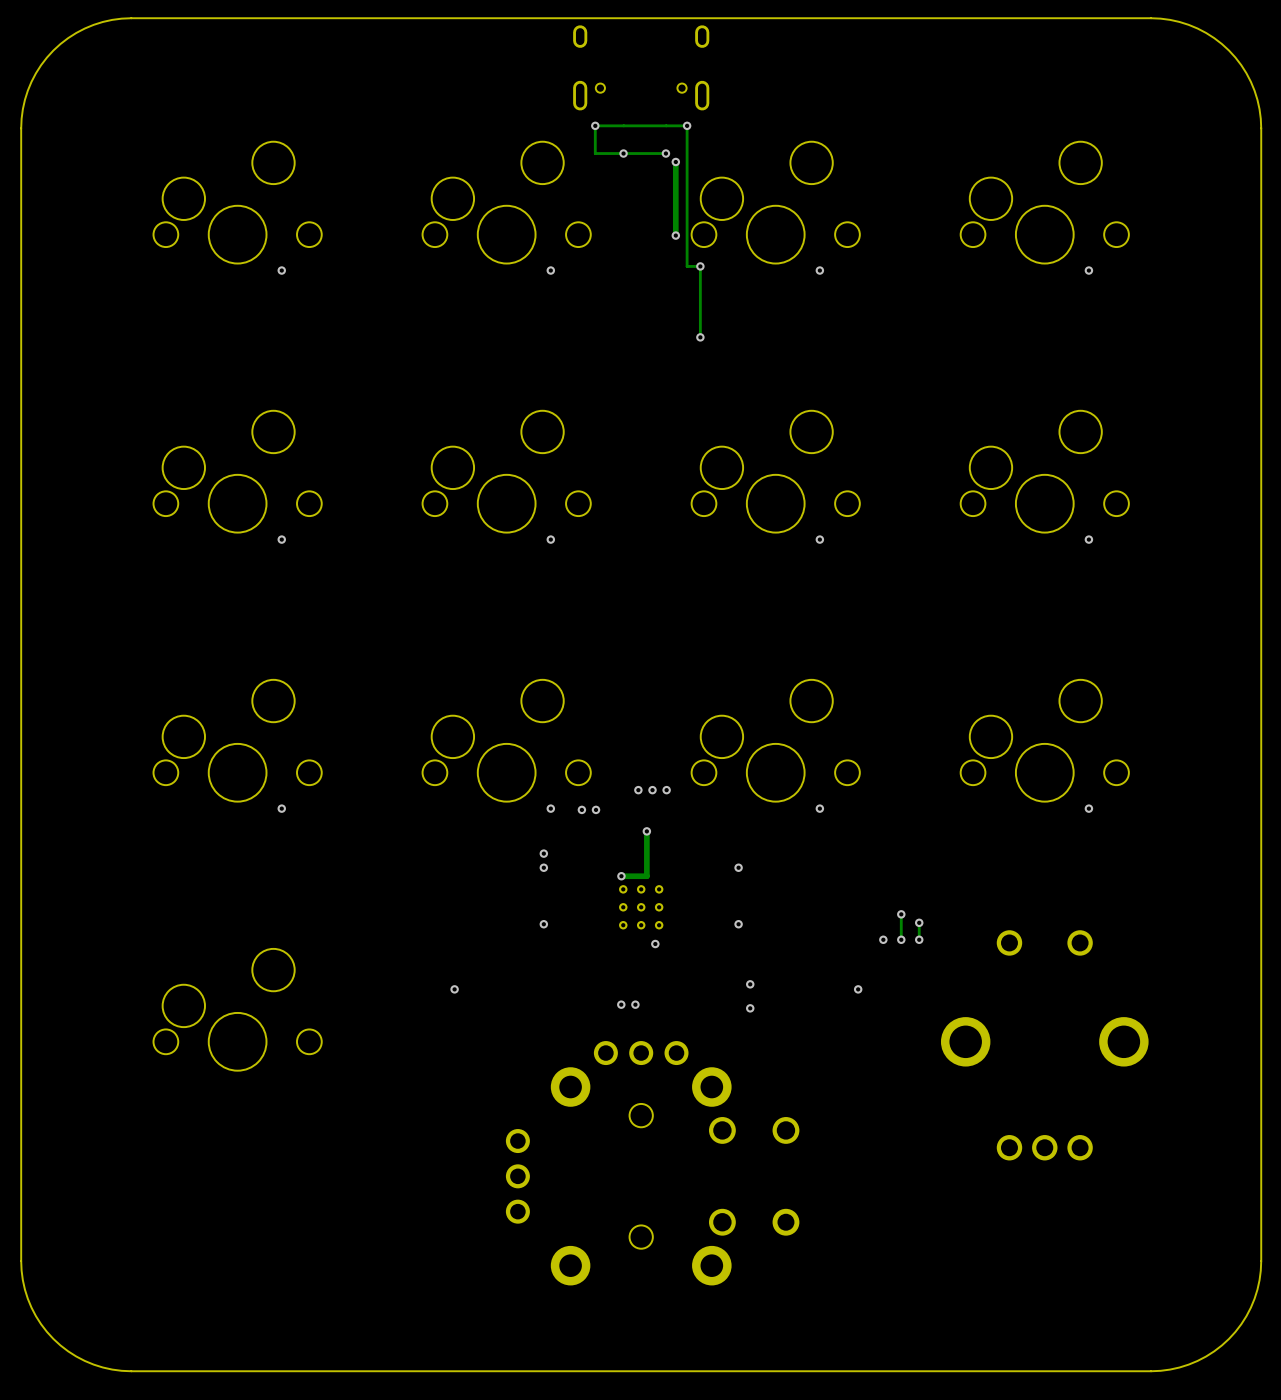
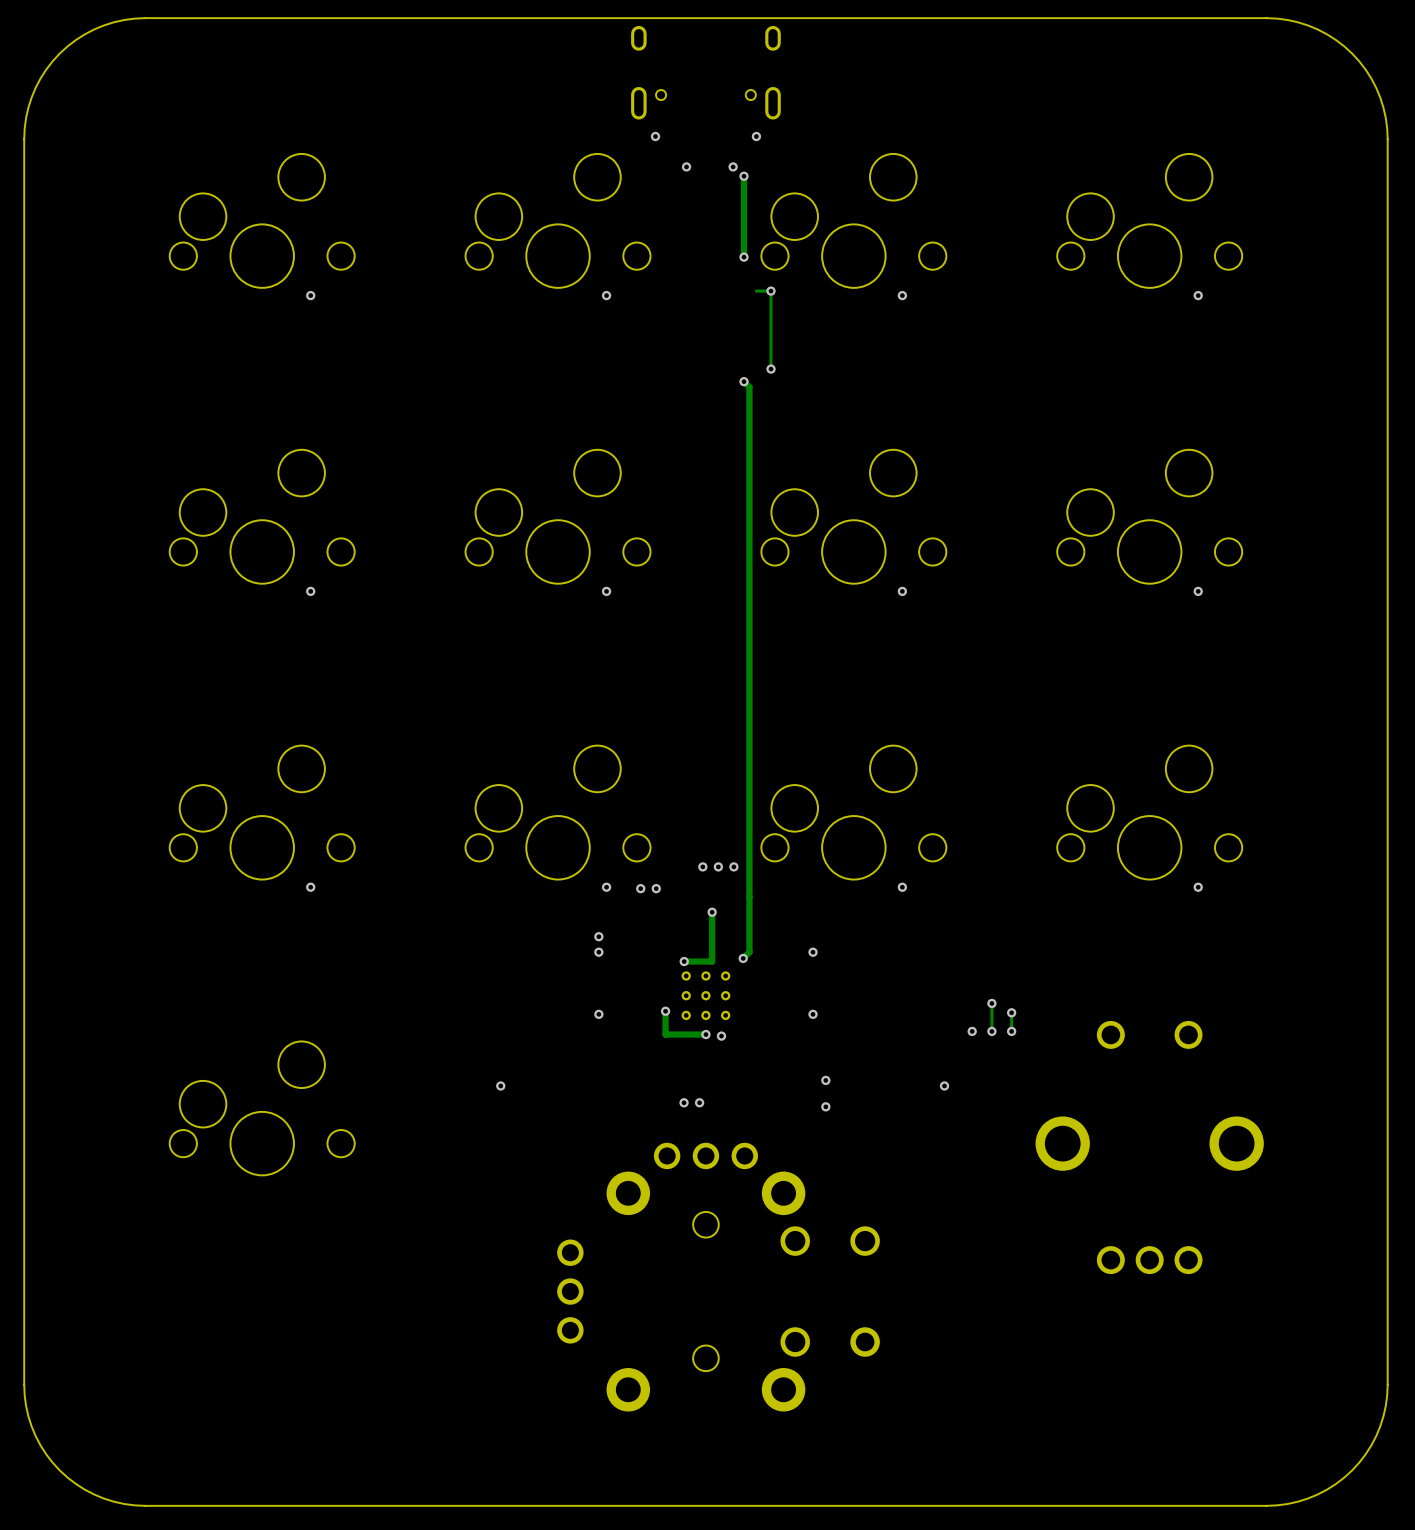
track: (665, 153) (595, 153) (595, 125) (687, 125) (687, 266) -> none
track: none -> (743, 381) (749, 387) (749, 952) (743, 958)
via: none -> (743, 381)
via: none -> (743, 958)
track: none -> (665, 1011) (665, 1034) (705, 1034)
via: none -> (665, 1011)
via: none -> (705, 1034)

